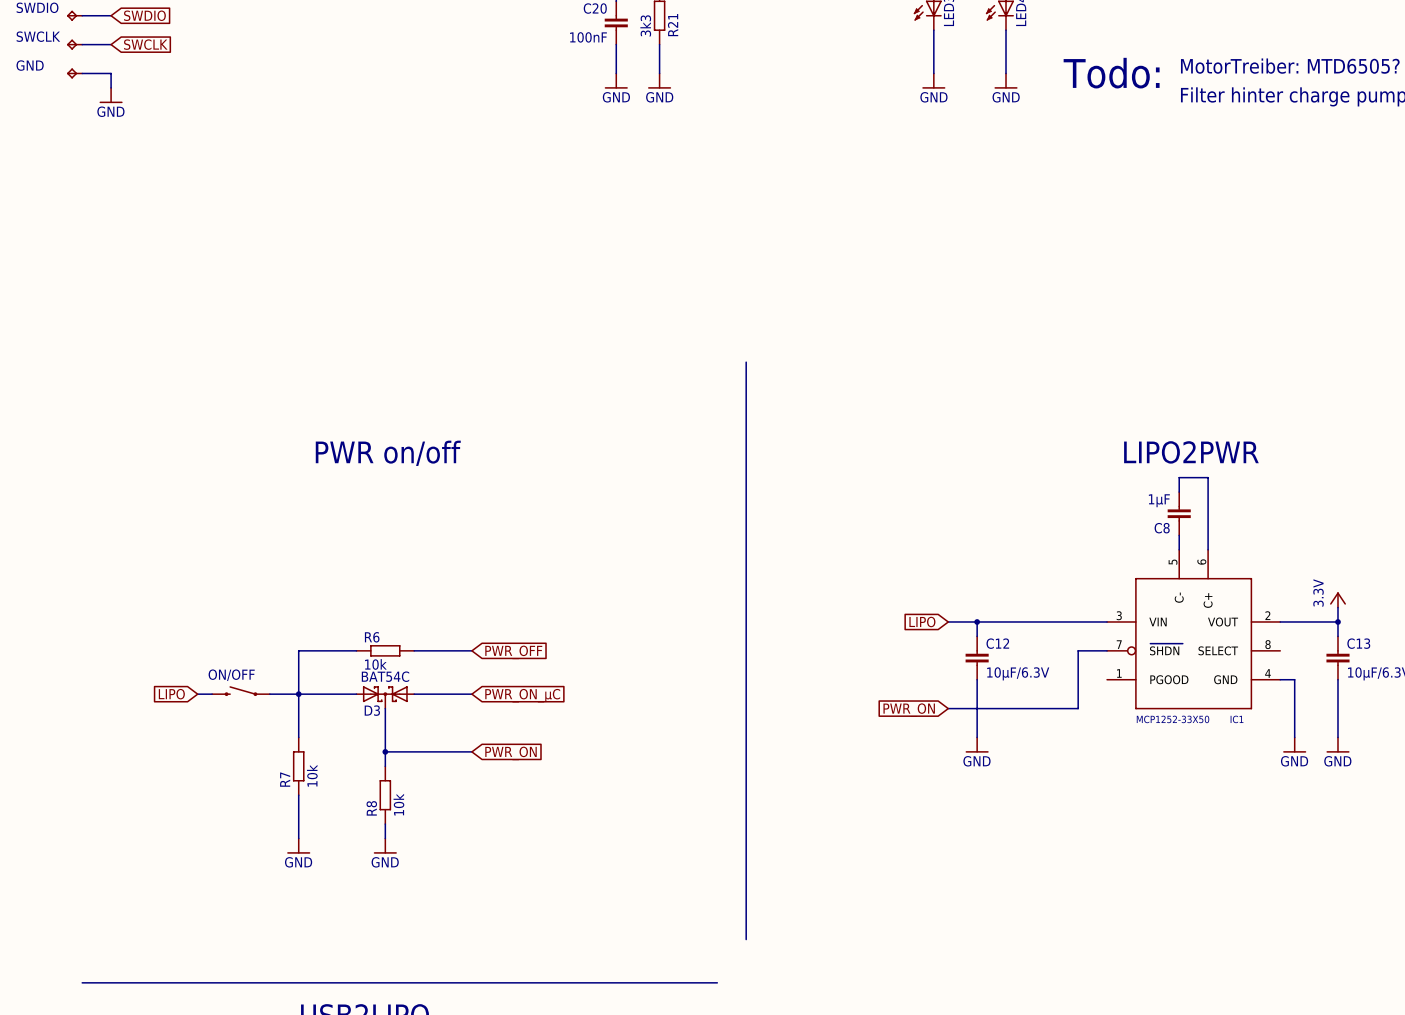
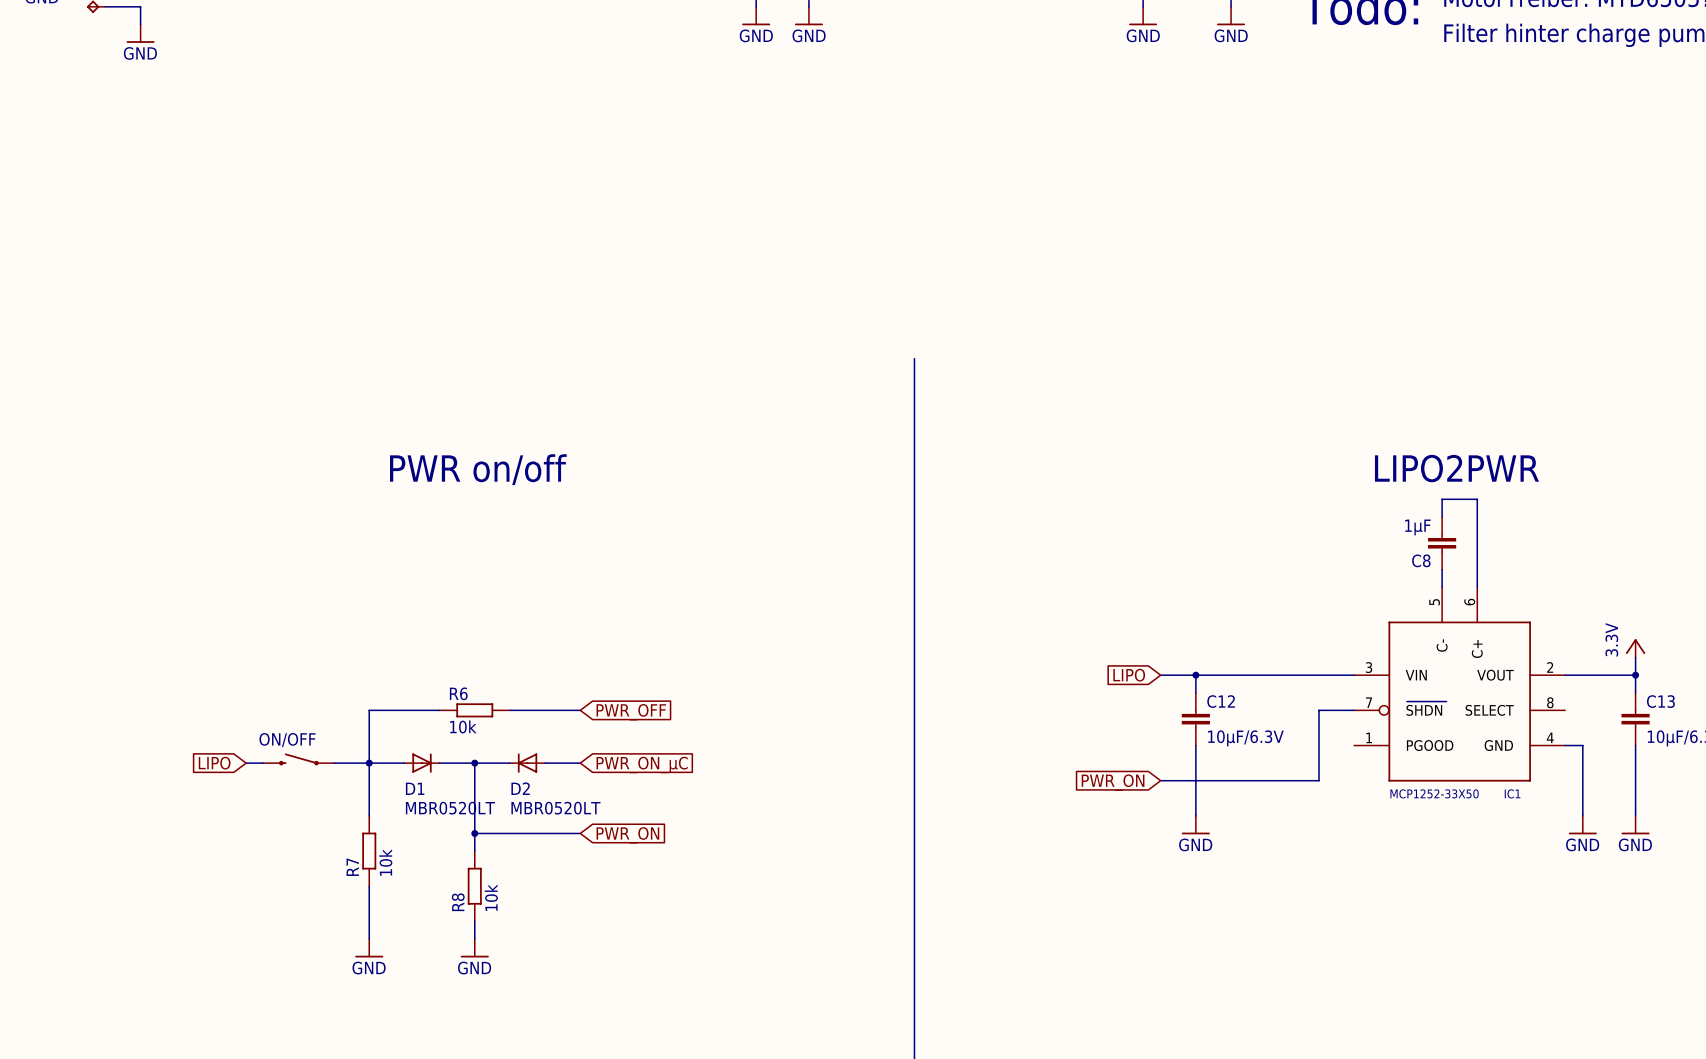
D1: none -> MBR0520LT (422, 763)
junction: none -> (474, 763)
D2: none -> MBR0520LT (527, 763)
D3: BAT54C (385, 697) -> none

